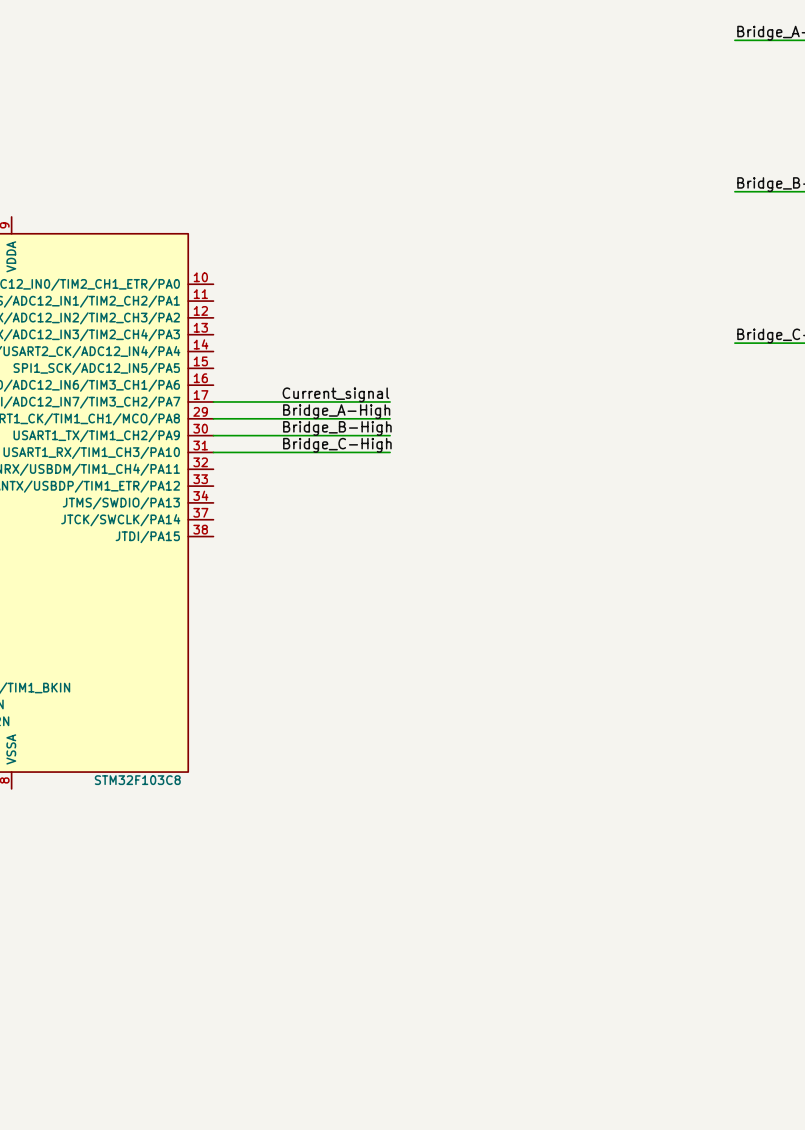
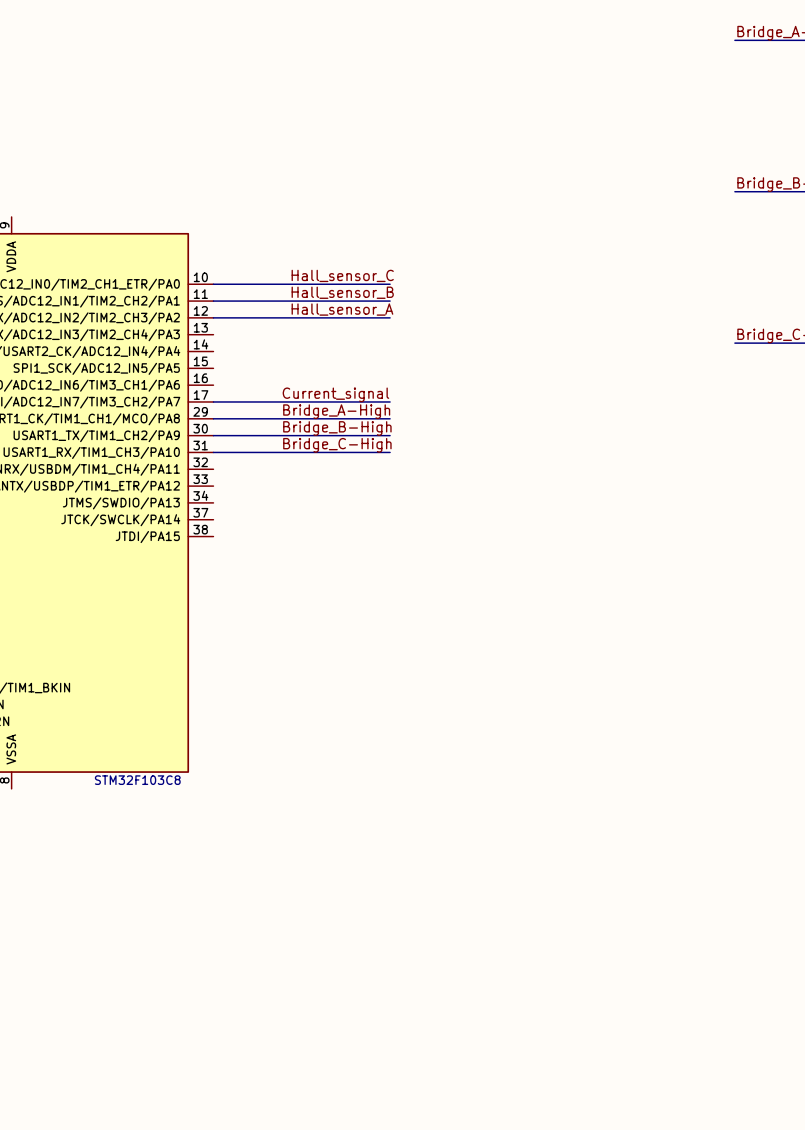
label: none -> Hall_sensor_C (342, 275)
wire: none -> (213, 284) (390, 284)
label: none -> Hall_sensor_B (342, 292)
wire: none -> (213, 301) (390, 301)
label: none -> Hall_sensor_A (342, 309)
wire: none -> (213, 317) (390, 317)

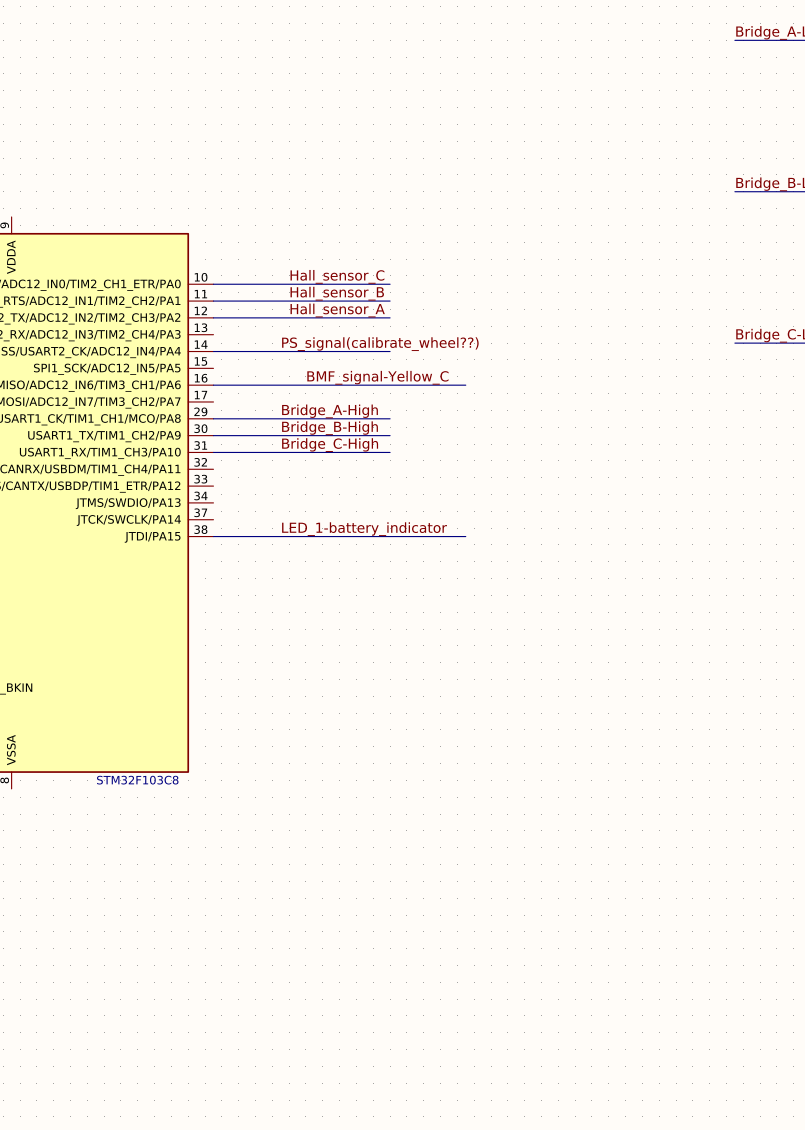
label: none -> PS_signal(calibrate_wheel??) (380, 344)
label: none -> BMF_signal-Yellow_C (377, 377)
wire: none -> (213, 385) (465, 385)
label: Current_signal (335, 394) -> none
wire: (213, 401) (390, 401) -> (213, 351) (390, 351)
label: none -> LED_1-battery_indicator (364, 529)
wire: none -> (213, 536) (465, 536)

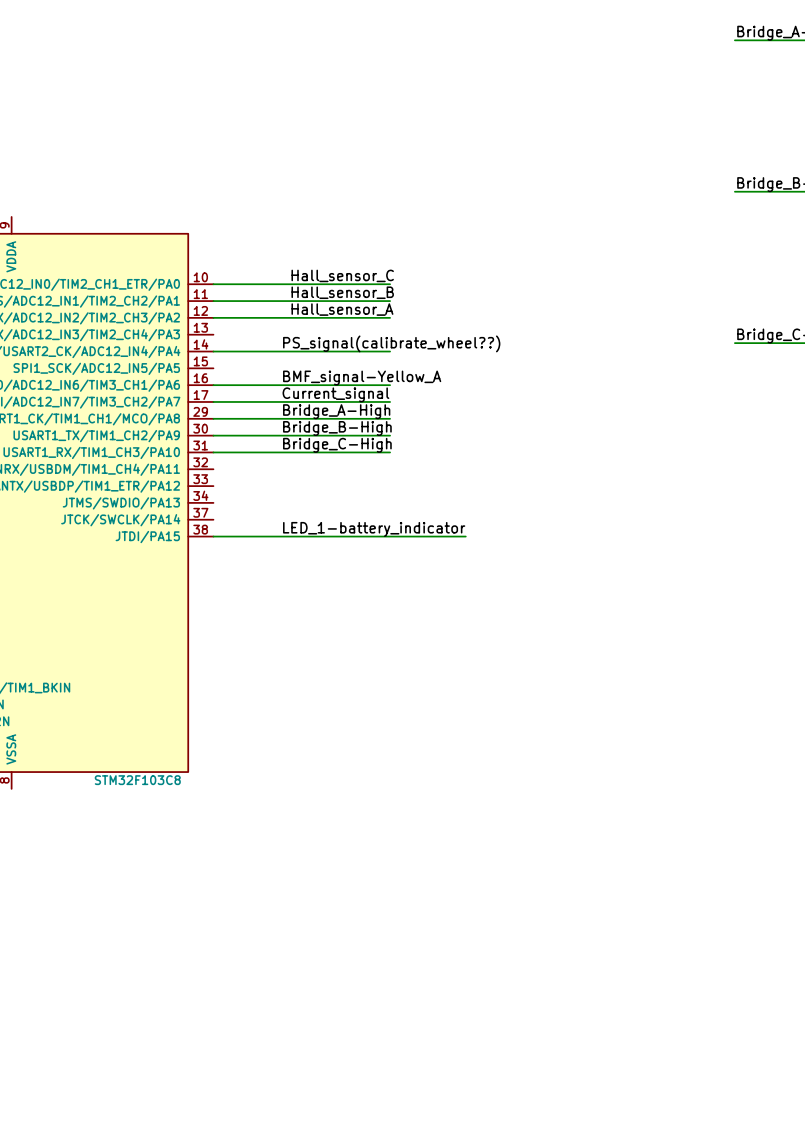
label: BMF_signal-Yellow_C (377, 377) -> BMF_signal-Yellow_A (362, 378)
wire: (390, 385) (465, 385) -> none
label: none -> Current_signal (335, 394)
wire: none -> (213, 401) (390, 401)

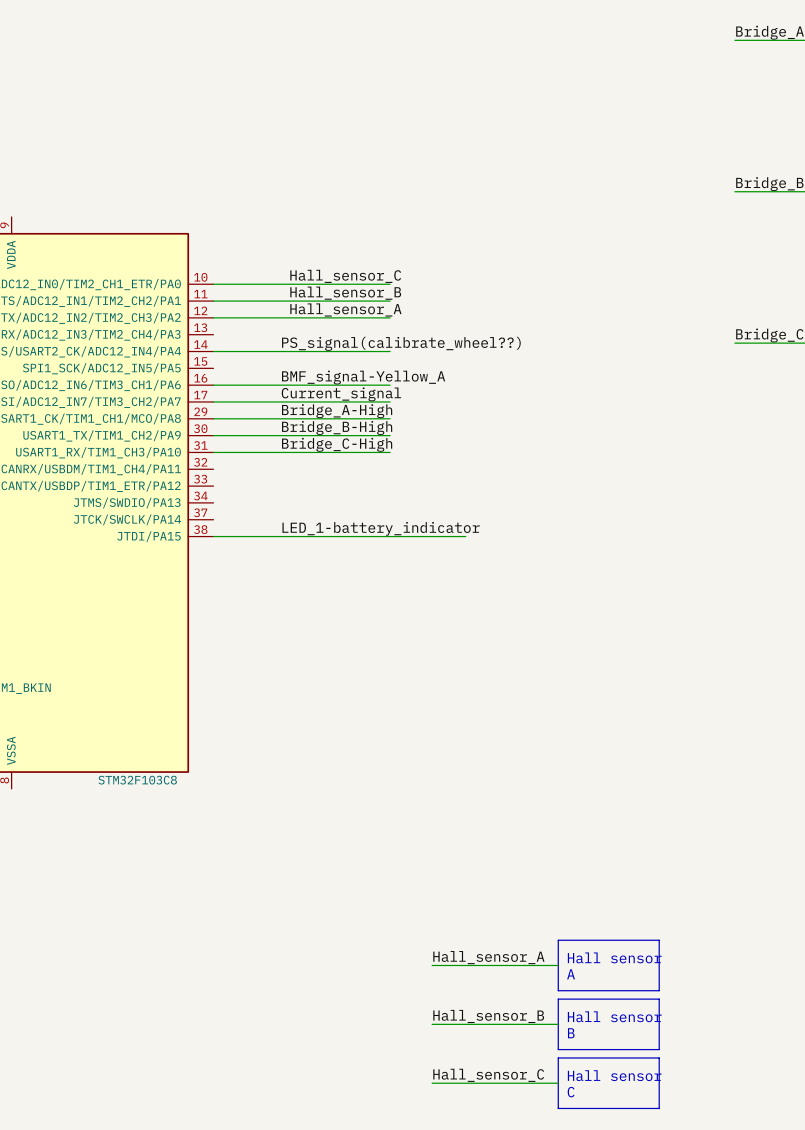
bus: none -> (558, 940) (659, 940) (659, 990) (558, 990) (558, 940)
label: none -> Hall_sensor_A (488, 957)
text: none -> Hall sensor (614, 957)
wire: none -> (432, 965) (558, 965)
text: none -> A (571, 974)
bus: none -> (558, 999) (558, 1049) (659, 1049) (659, 999) (558, 999)
label: none -> Hall_sensor_B (488, 1016)
text: none -> Hall sensor (614, 1016)
wire: none -> (432, 1024) (558, 1024)
text: none -> B (571, 1033)
bus: none -> (558, 1058) (558, 1108) (659, 1108) (659, 1058) (558, 1058)
label: none -> Hall_sensor_C (488, 1075)
text: none -> Hall sensor (614, 1075)
wire: none -> (432, 1083) (558, 1083)
text: none -> C (571, 1092)

